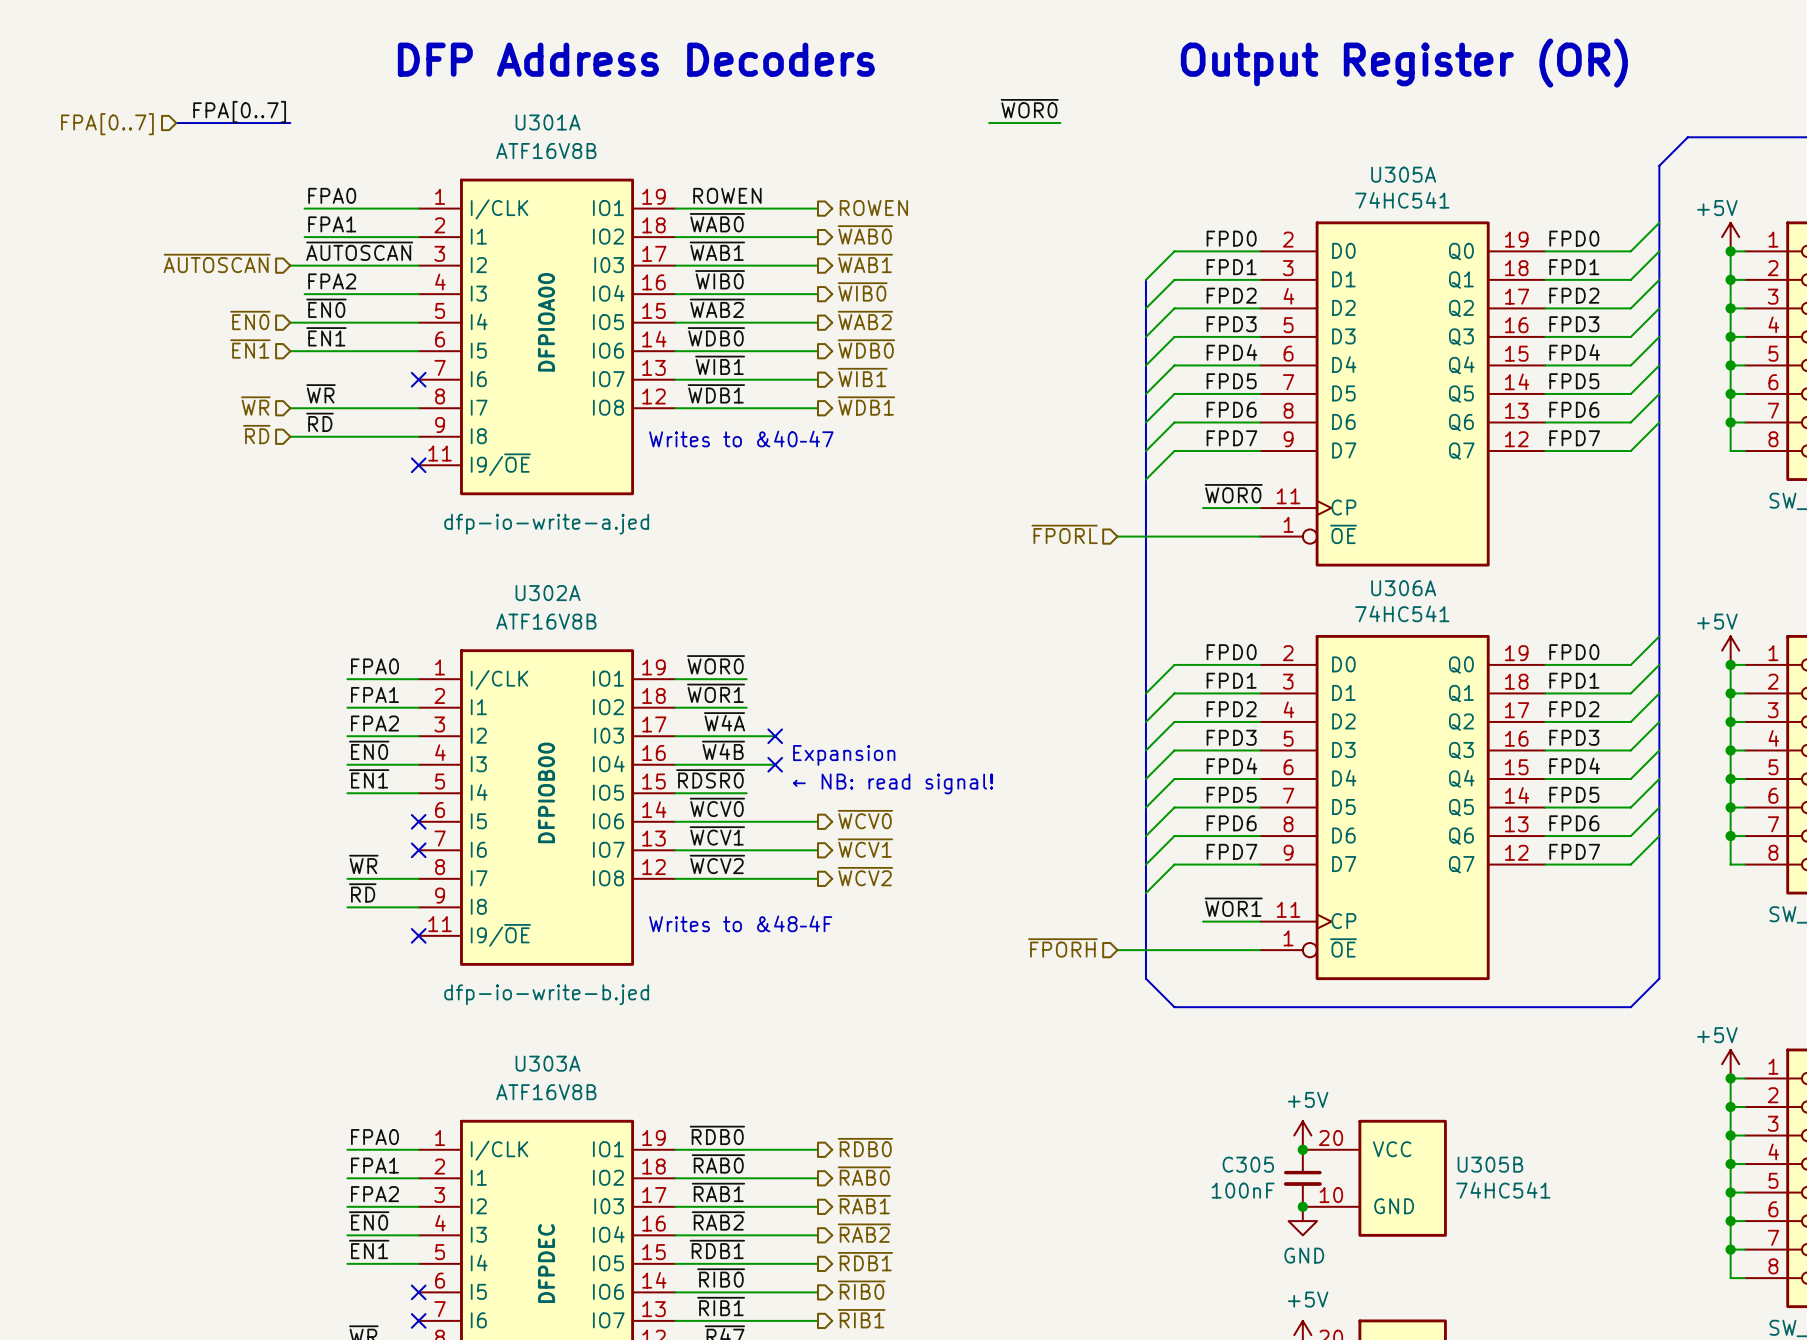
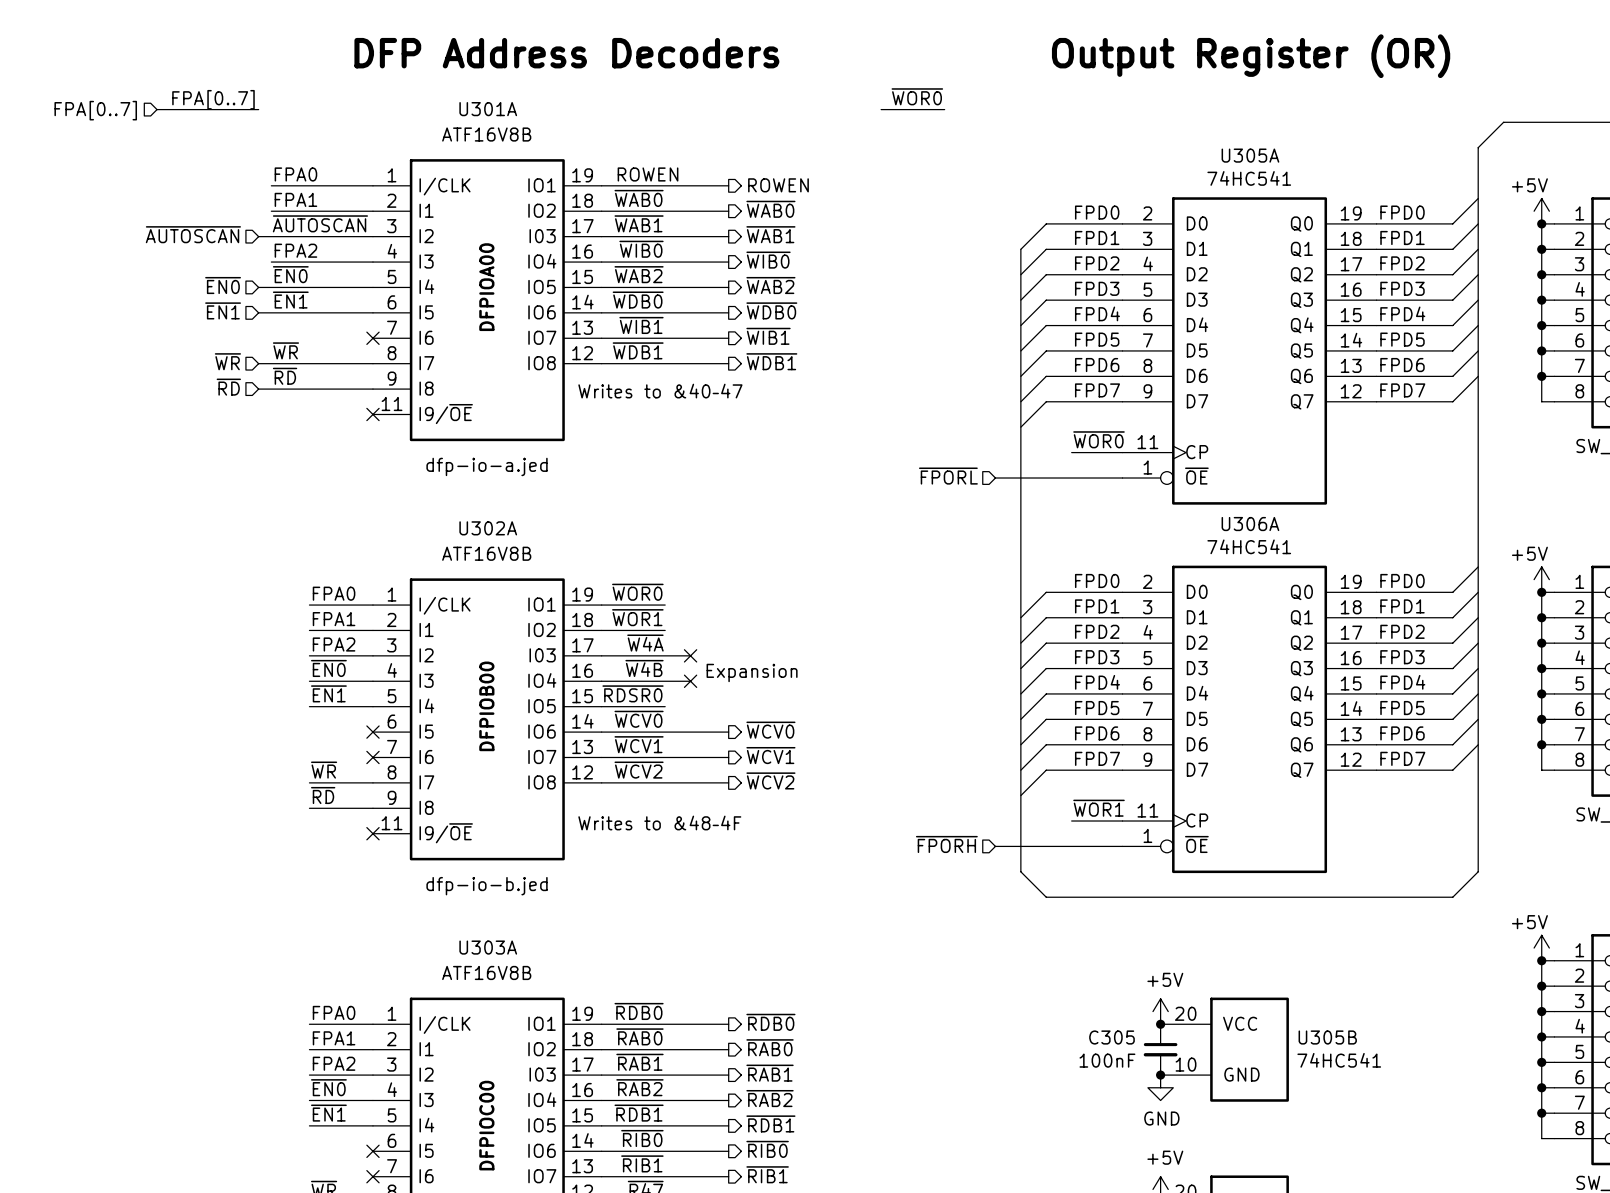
U301A text: dfp-io-write-a.jed (546, 524) -> dfp-io-a.jed (487, 466)
text: ← NB: read signal! (893, 783) -> none
U302A text: dfp-io-write-b.jed (546, 994) -> dfp-io-b.jed (487, 886)
U303A text: DFPDEC (546, 1263) -> DFPIOC00 (486, 1125)

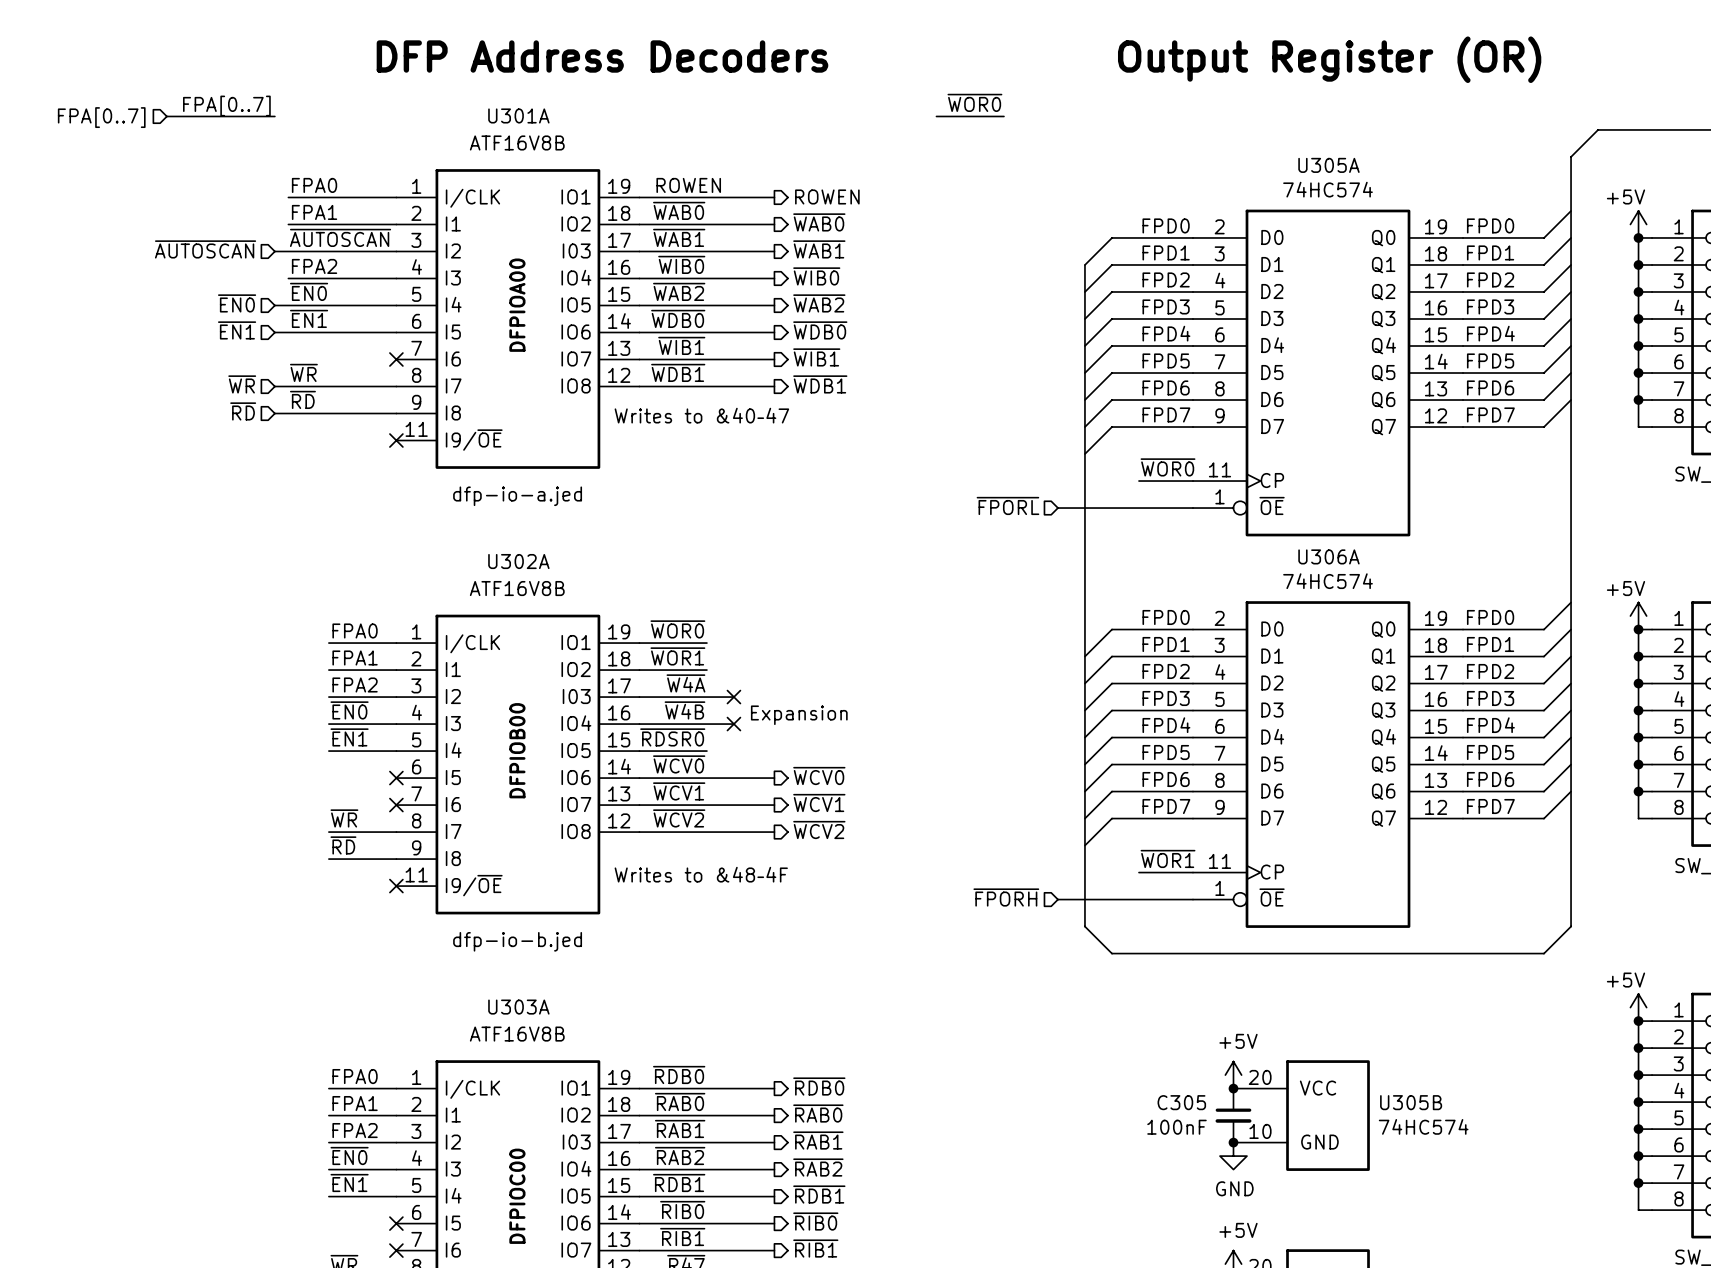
U305A value: 74HC541 (1249, 178) -> 74HC574 (1328, 189)
U306A value: 74HC541 (1249, 546) -> 74HC574 (1328, 581)
U305B value: 74HC541 (1339, 1060) -> 74HC574 (1423, 1126)

